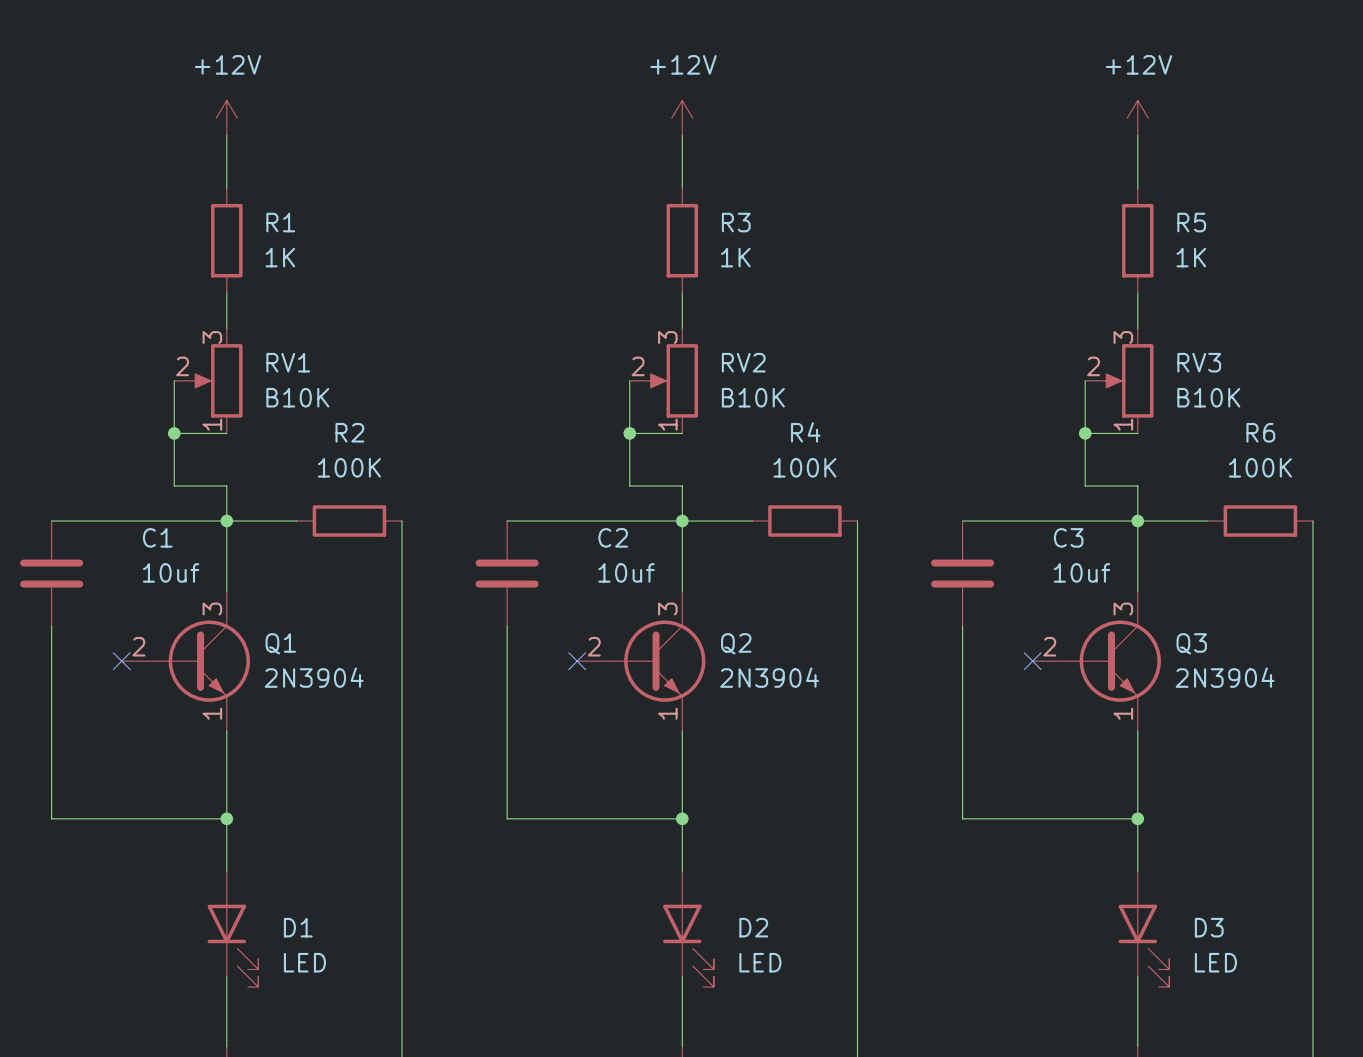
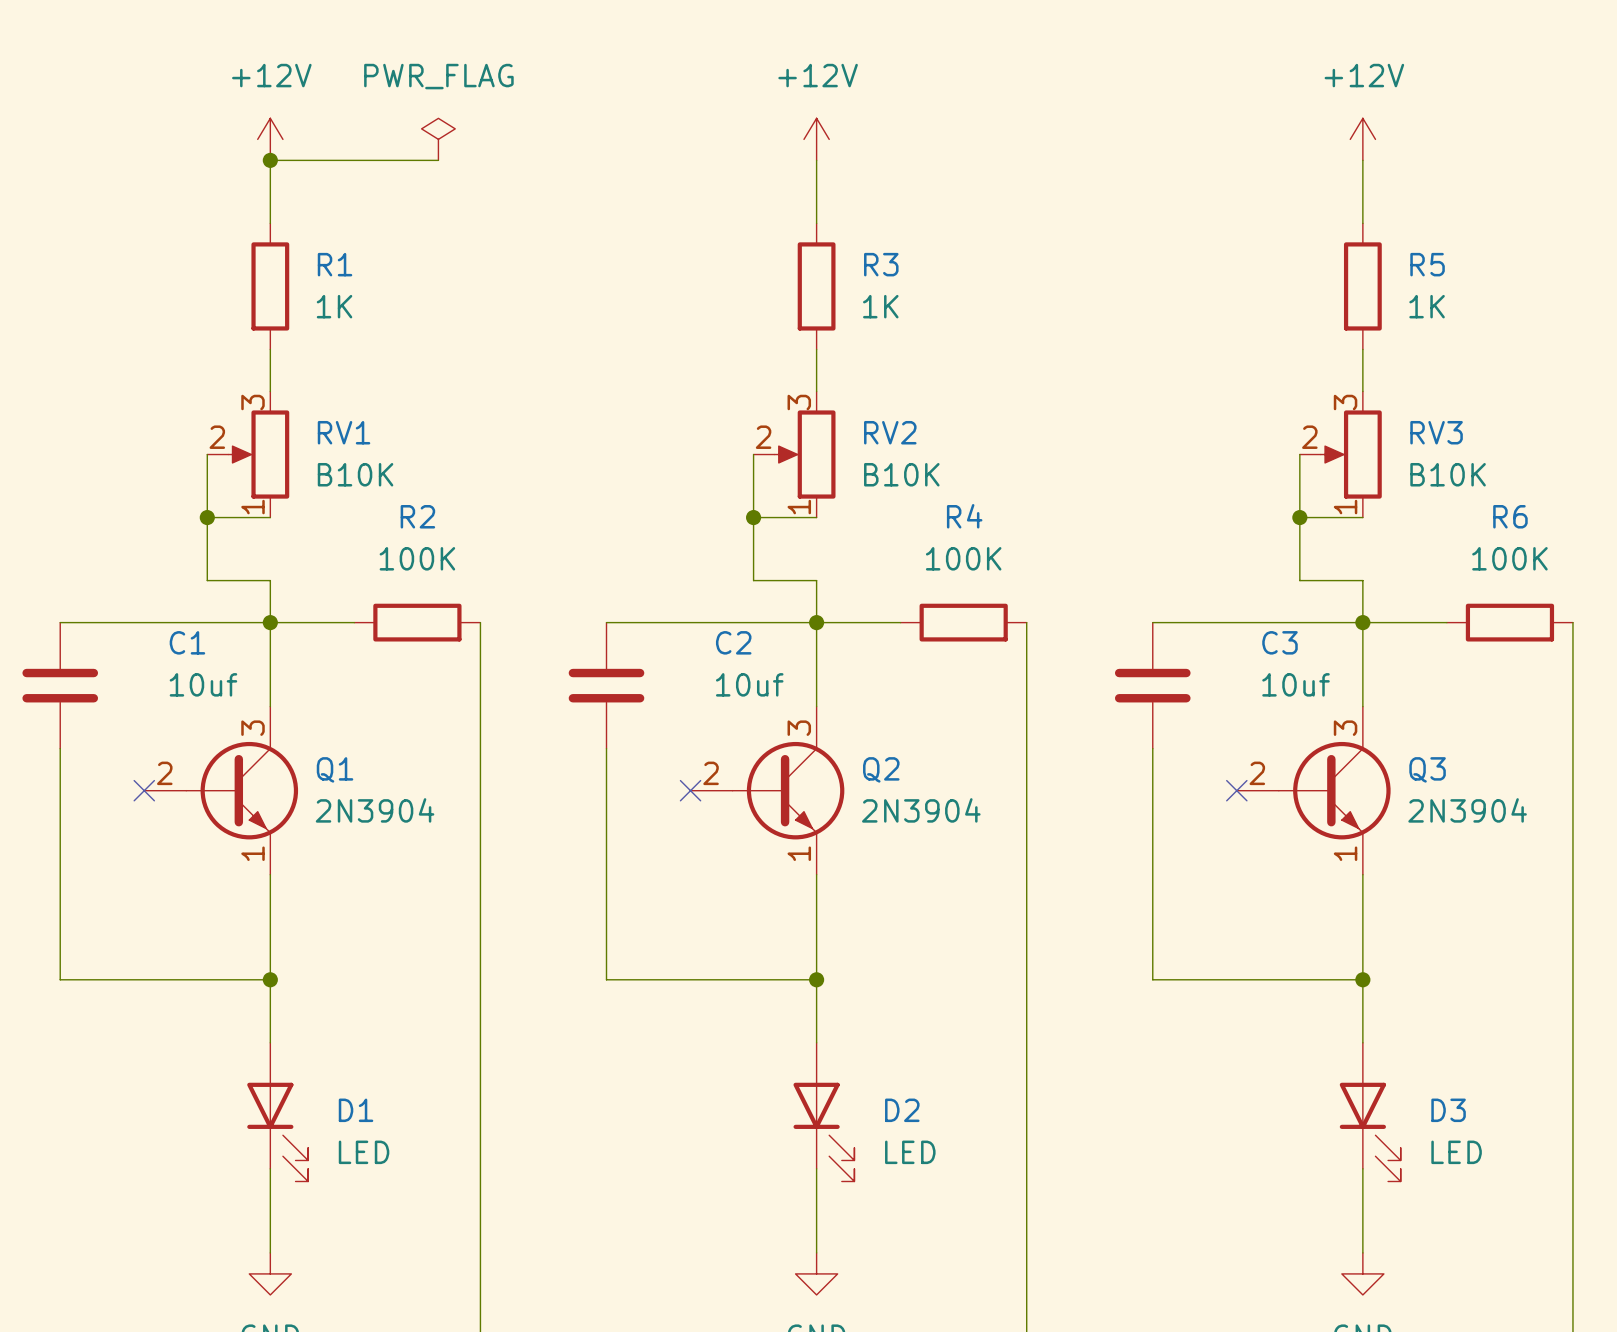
power symbol: none -> PWR_FLAG (438, 139)
wire: none -> (270, 160) (438, 160)
junction: none -> (270, 160)

